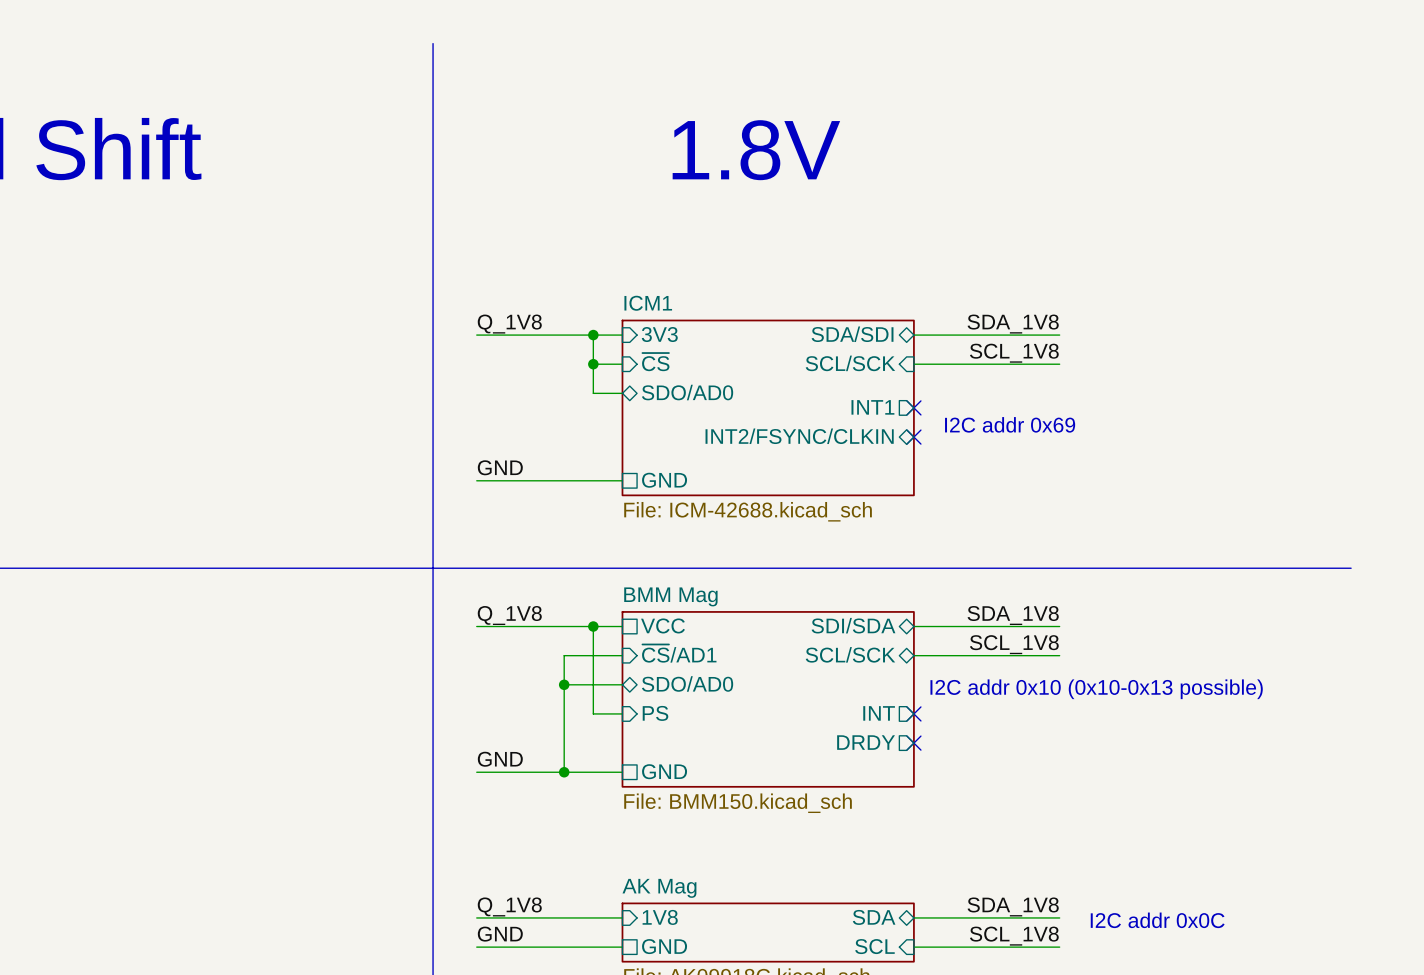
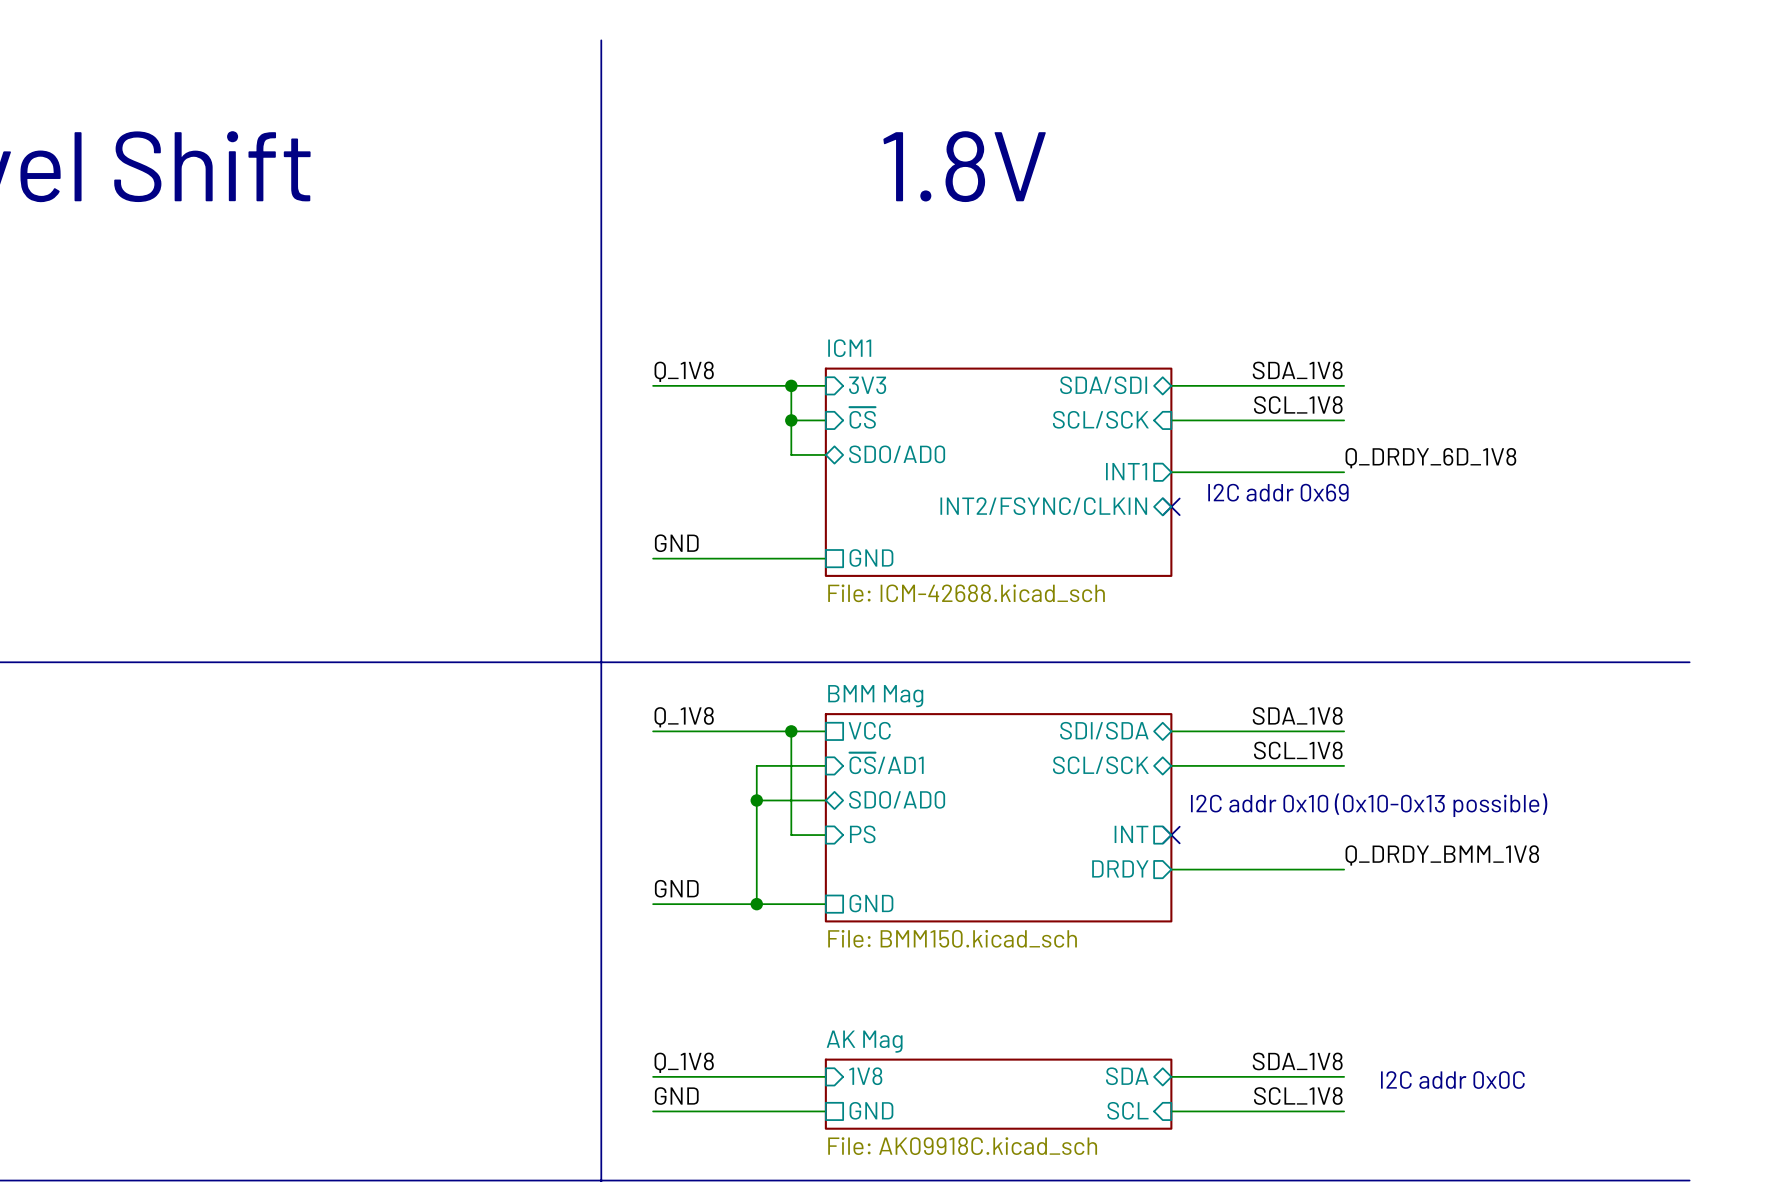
label: none -> Q_DRDY_6D_1V8 (1430, 458)
wire: none -> (1171, 472) (1344, 472)
no-connect mark: (913, 407) -> none
label: none -> Q_DRDY_BMM_1V8 (1442, 855)
wire: none -> (1171, 869) (1344, 869)
no-connect mark: (913, 743) -> none

